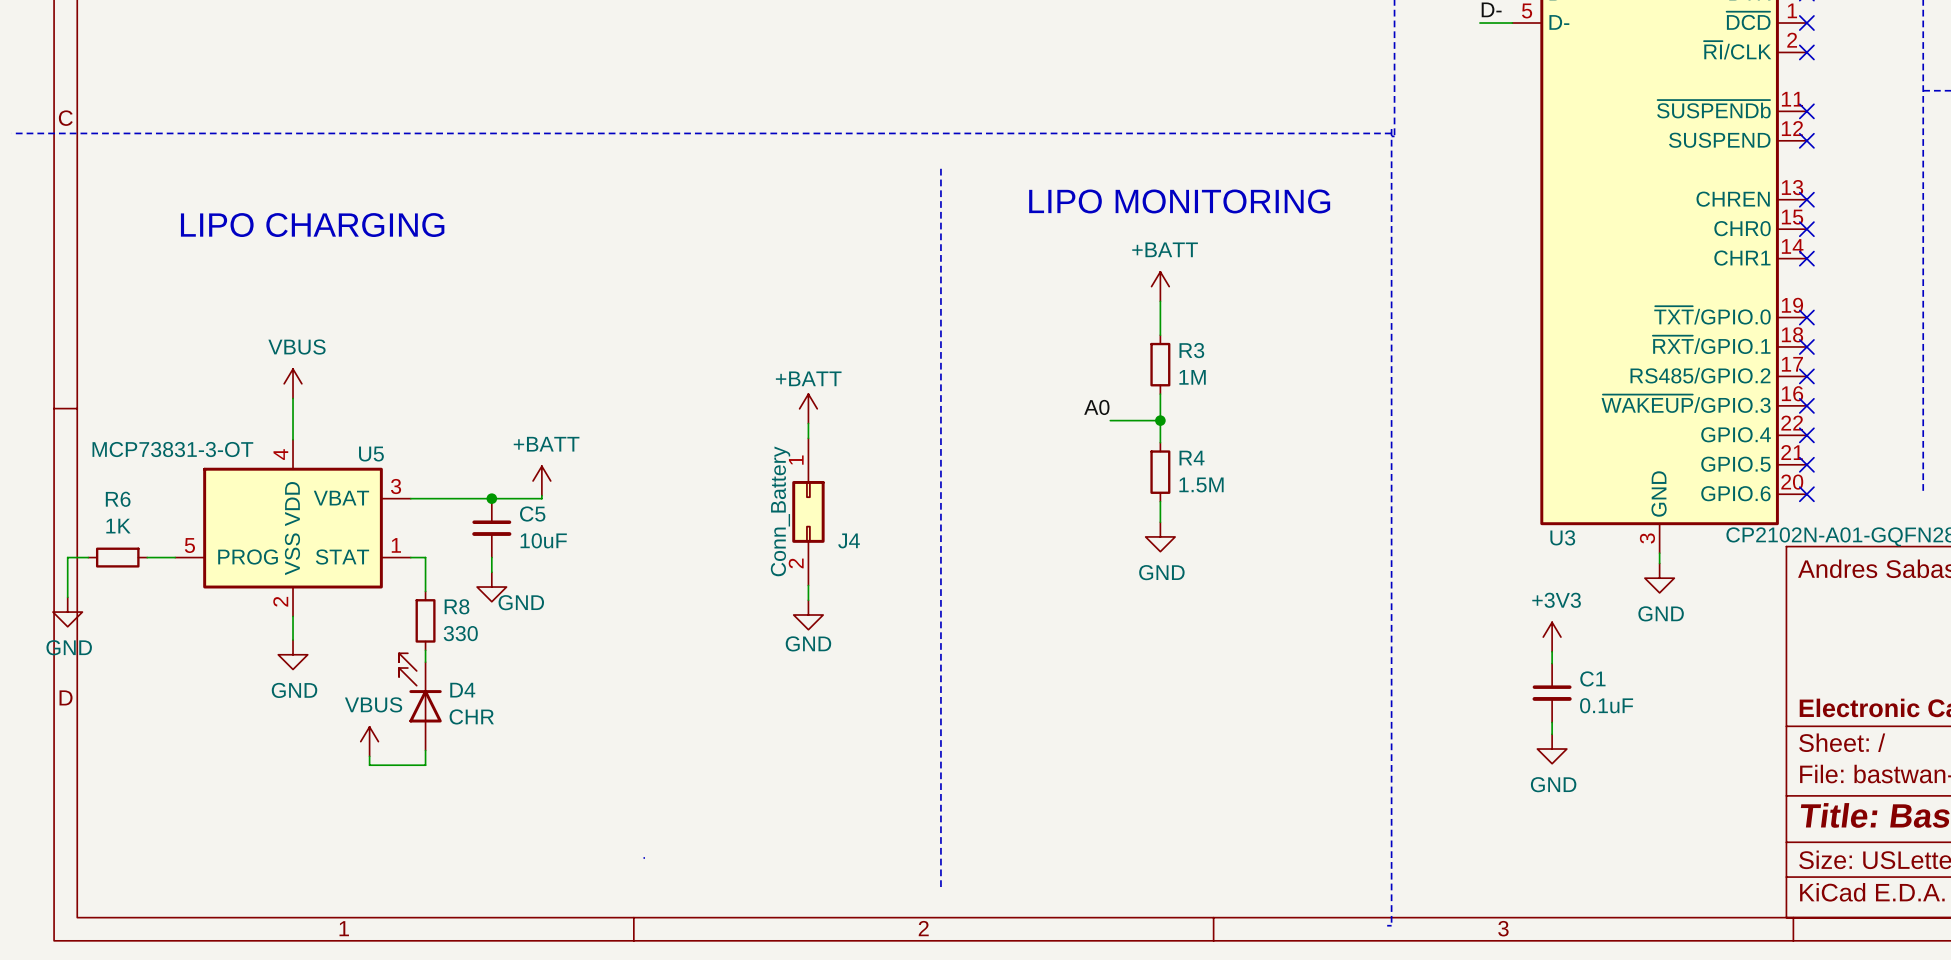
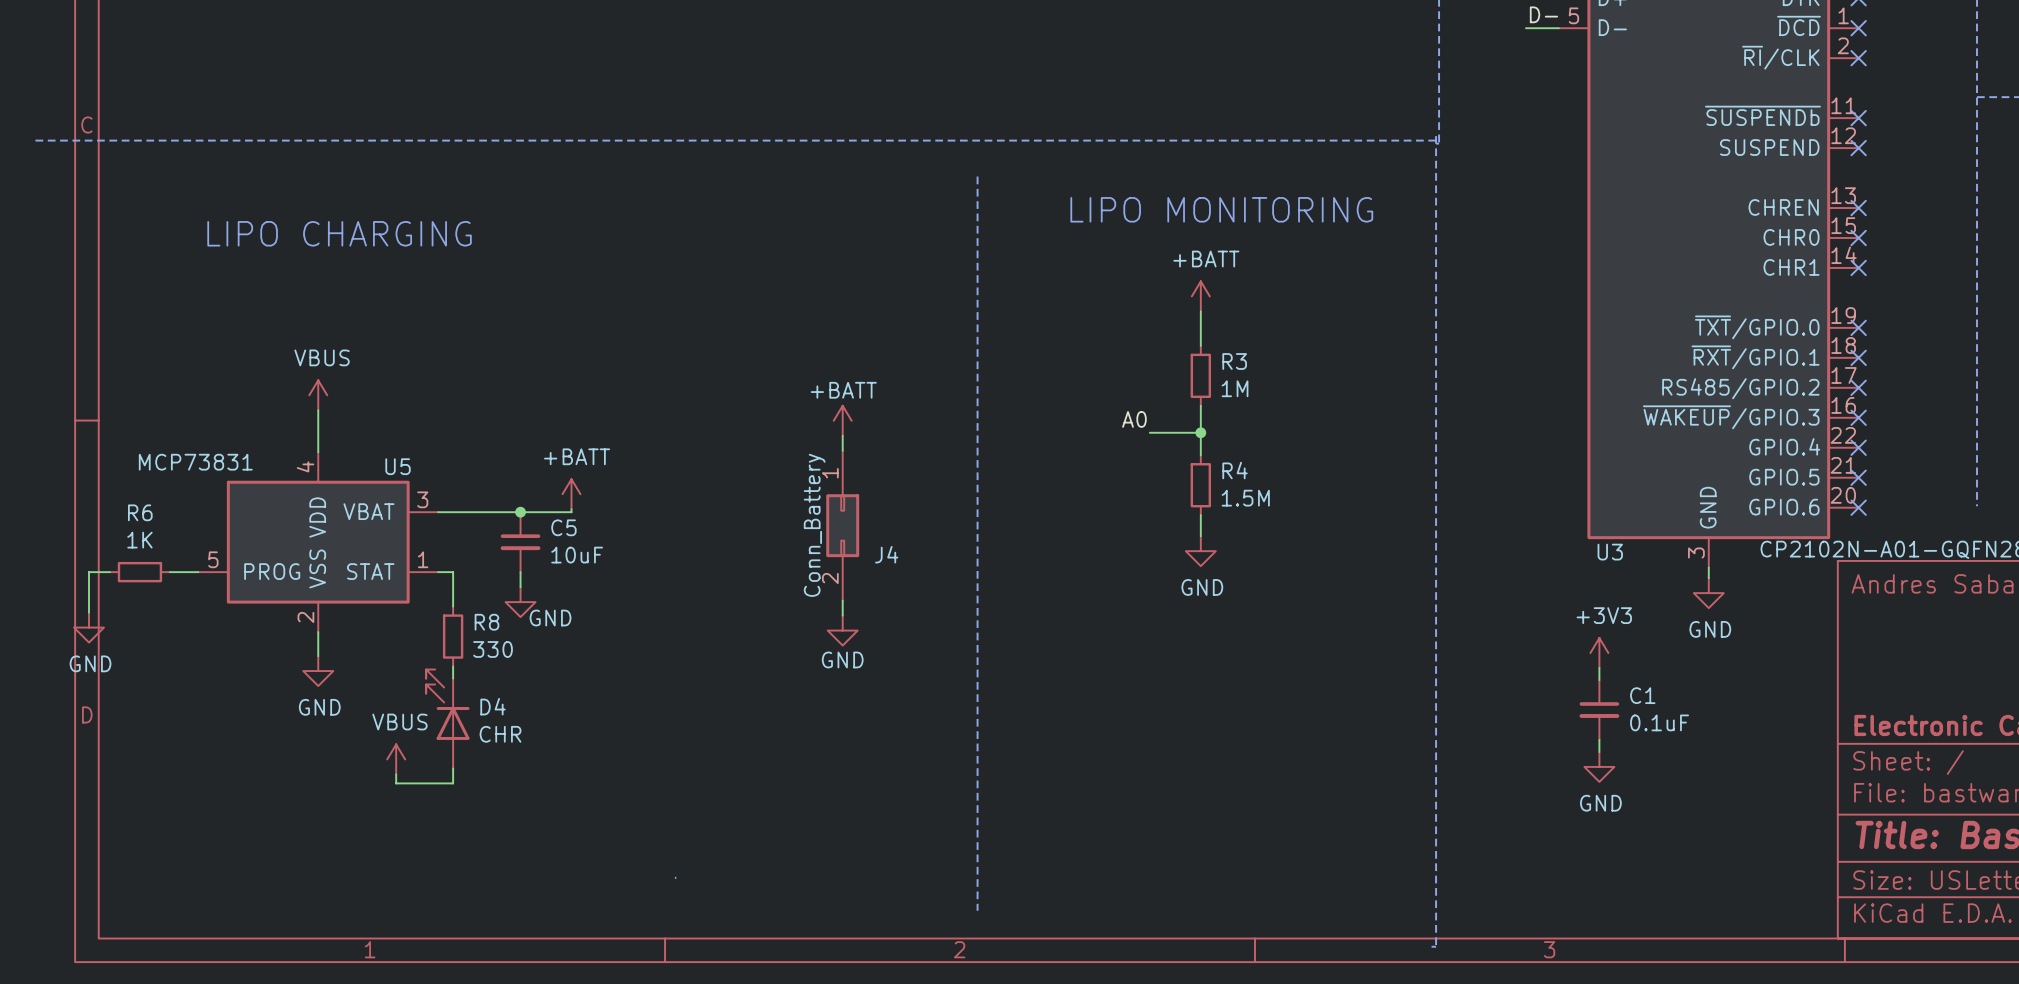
U5 value: MCP73831-3-OT (172, 449) -> MCP73831 (195, 462)

